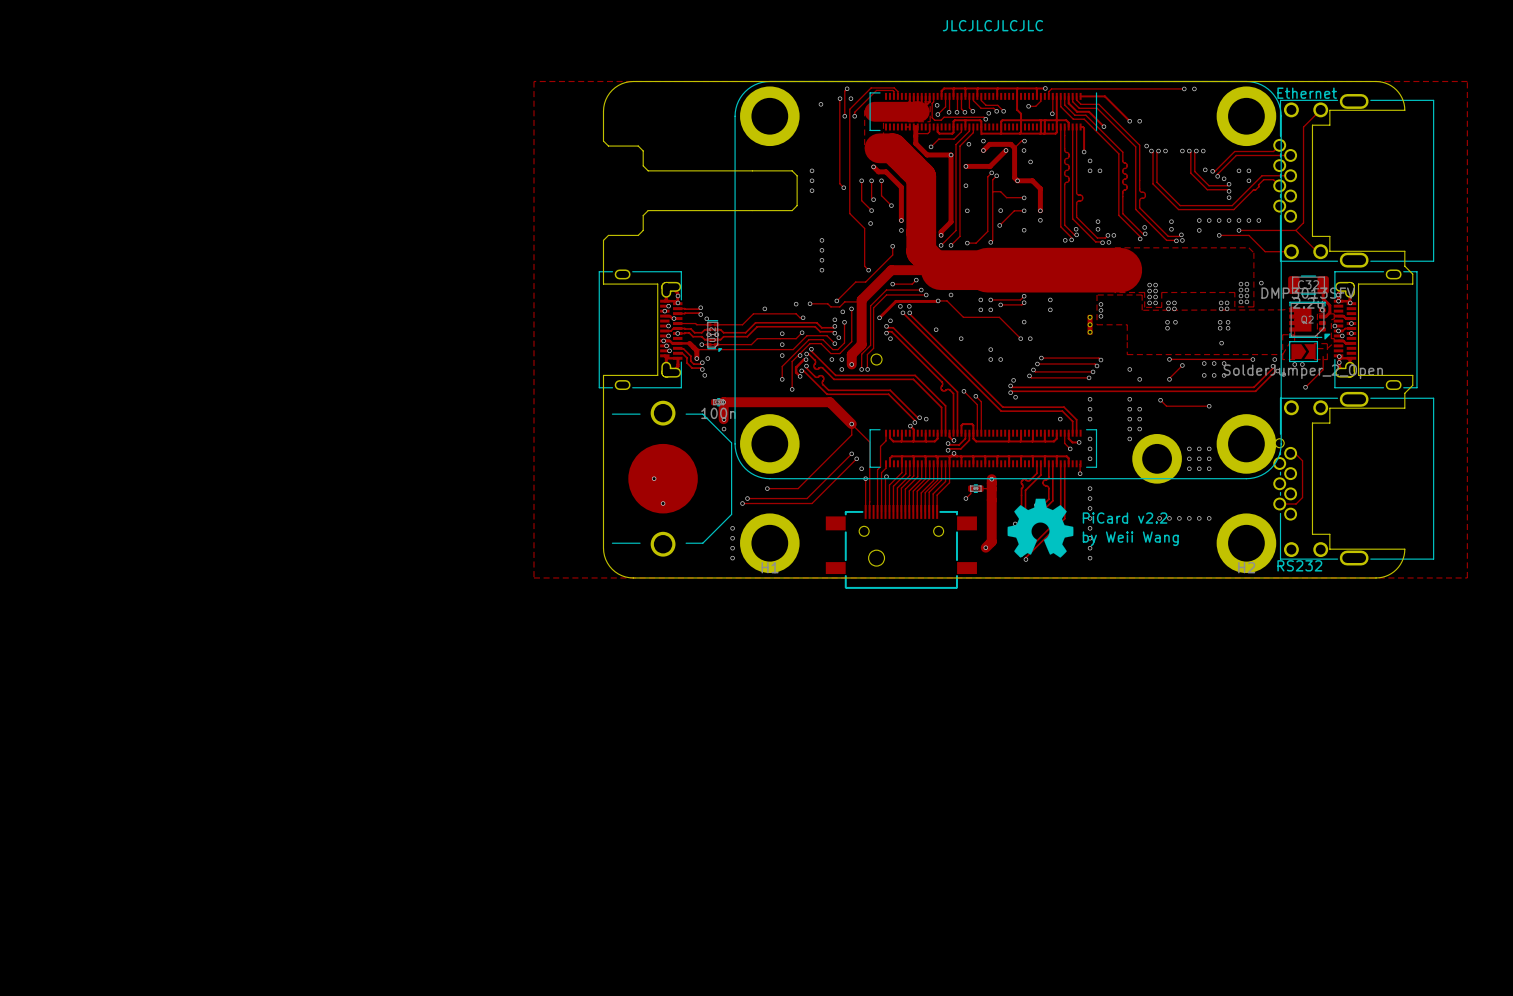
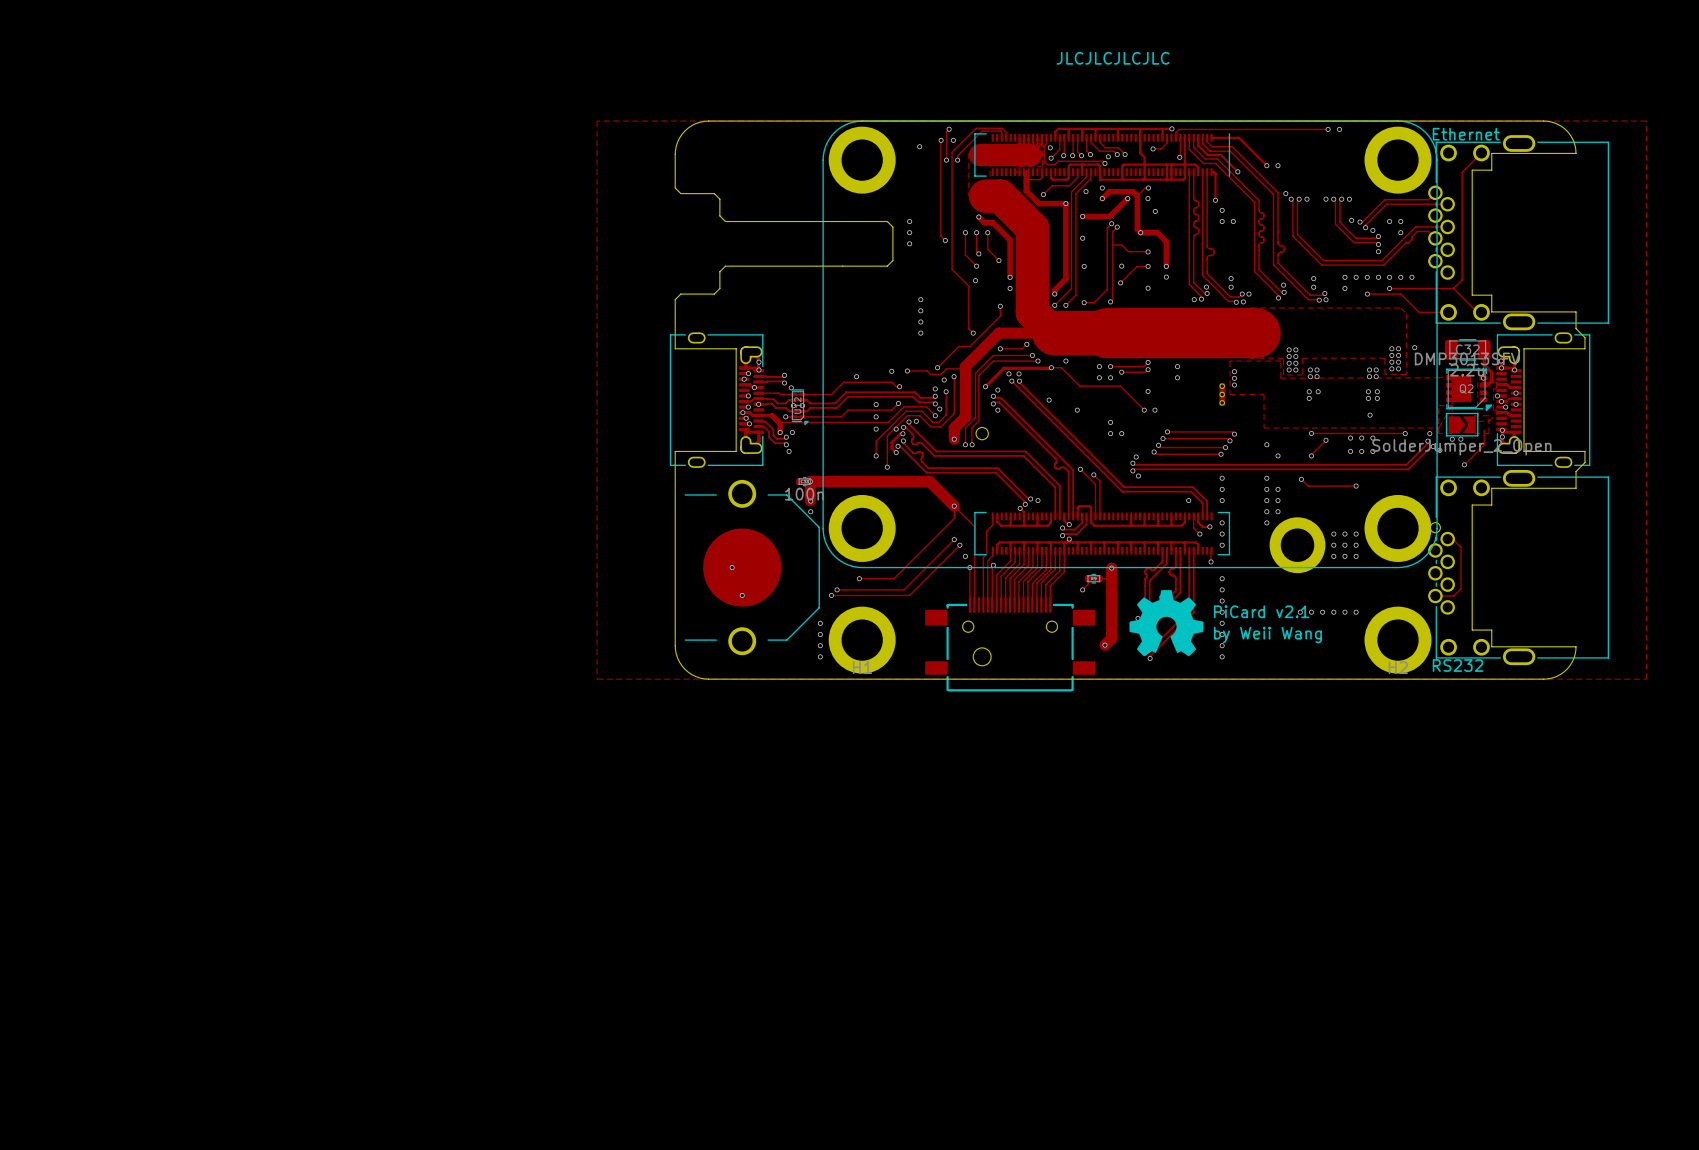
via: none -> (916, 421)
via: (831, 359) -> none
via: (841, 359) -> none
via: (841, 369) -> none
drawing shape: [1007, 498, 1179, 558] -> [1129, 590, 1322, 657]

